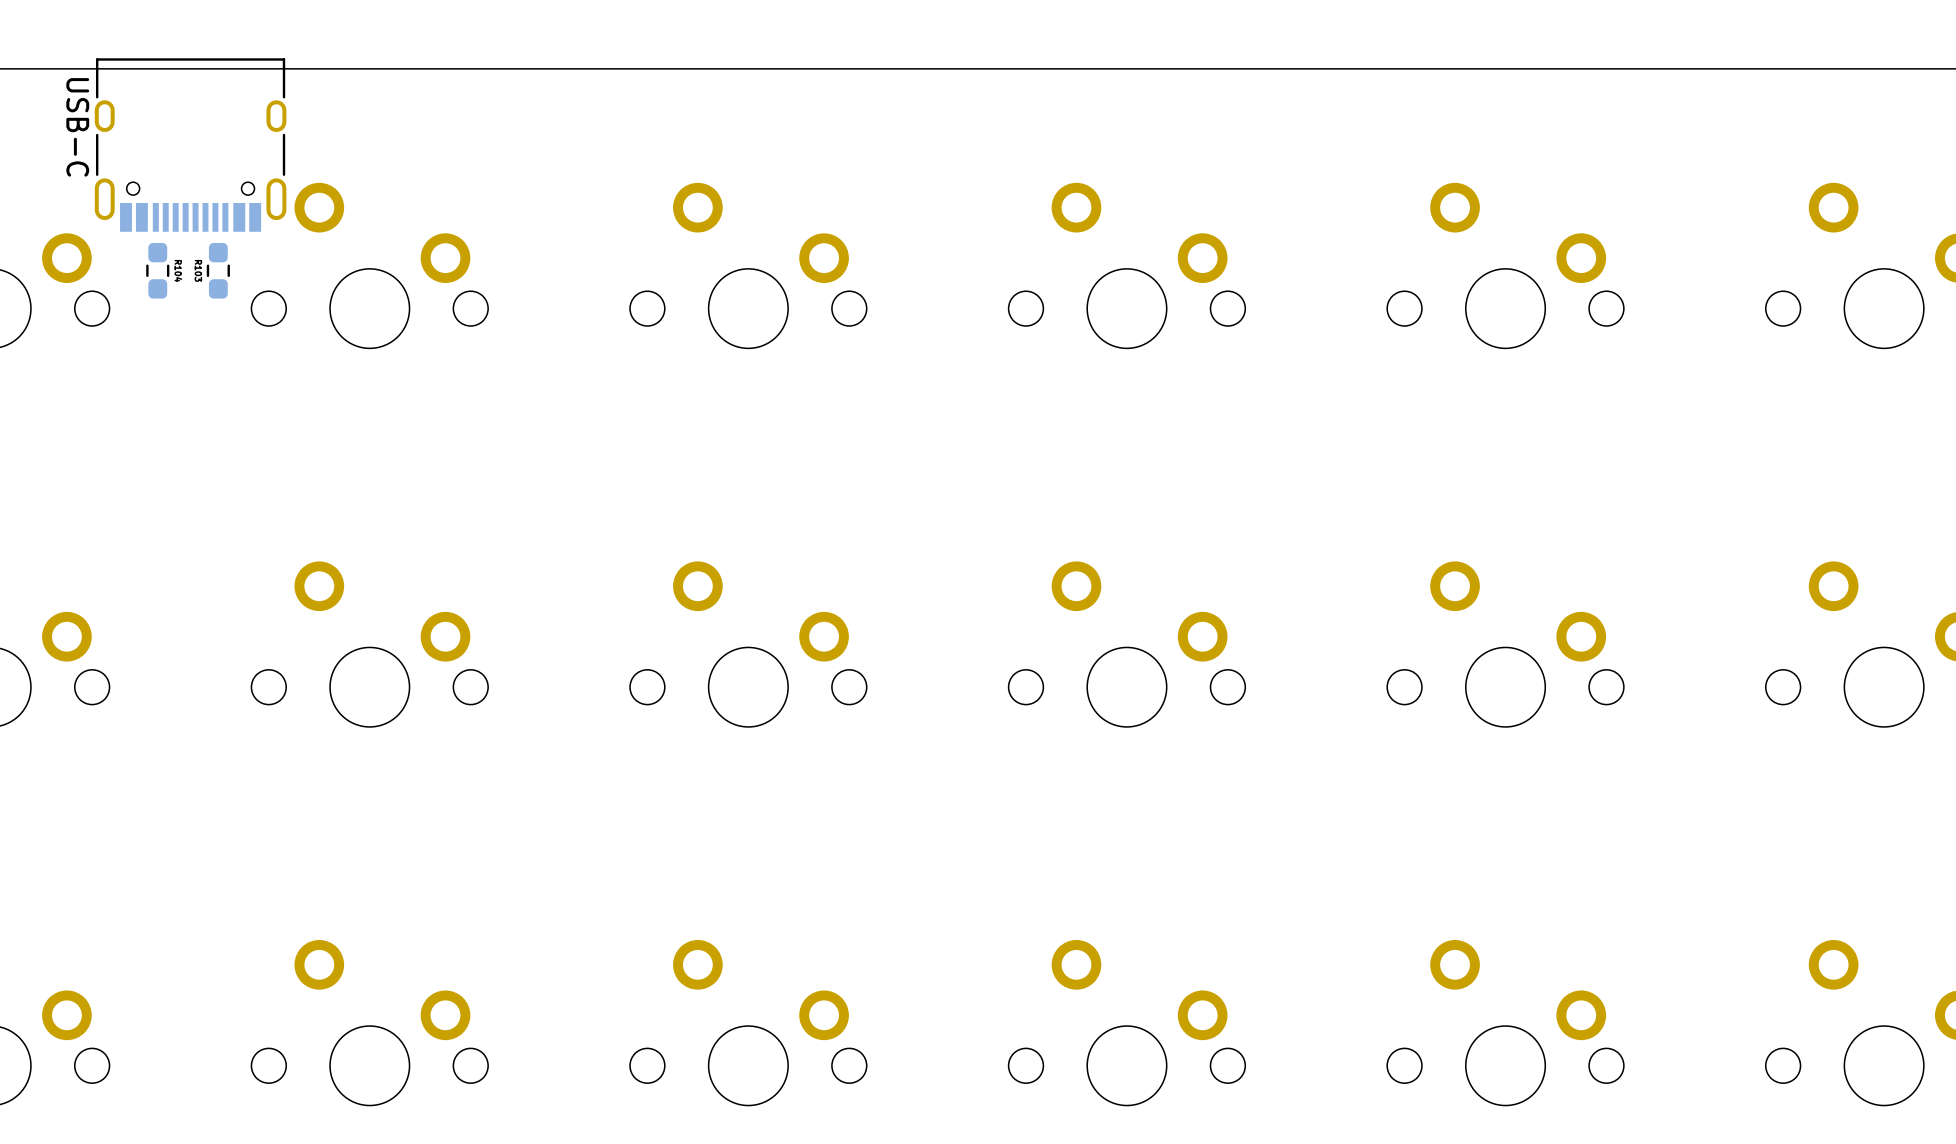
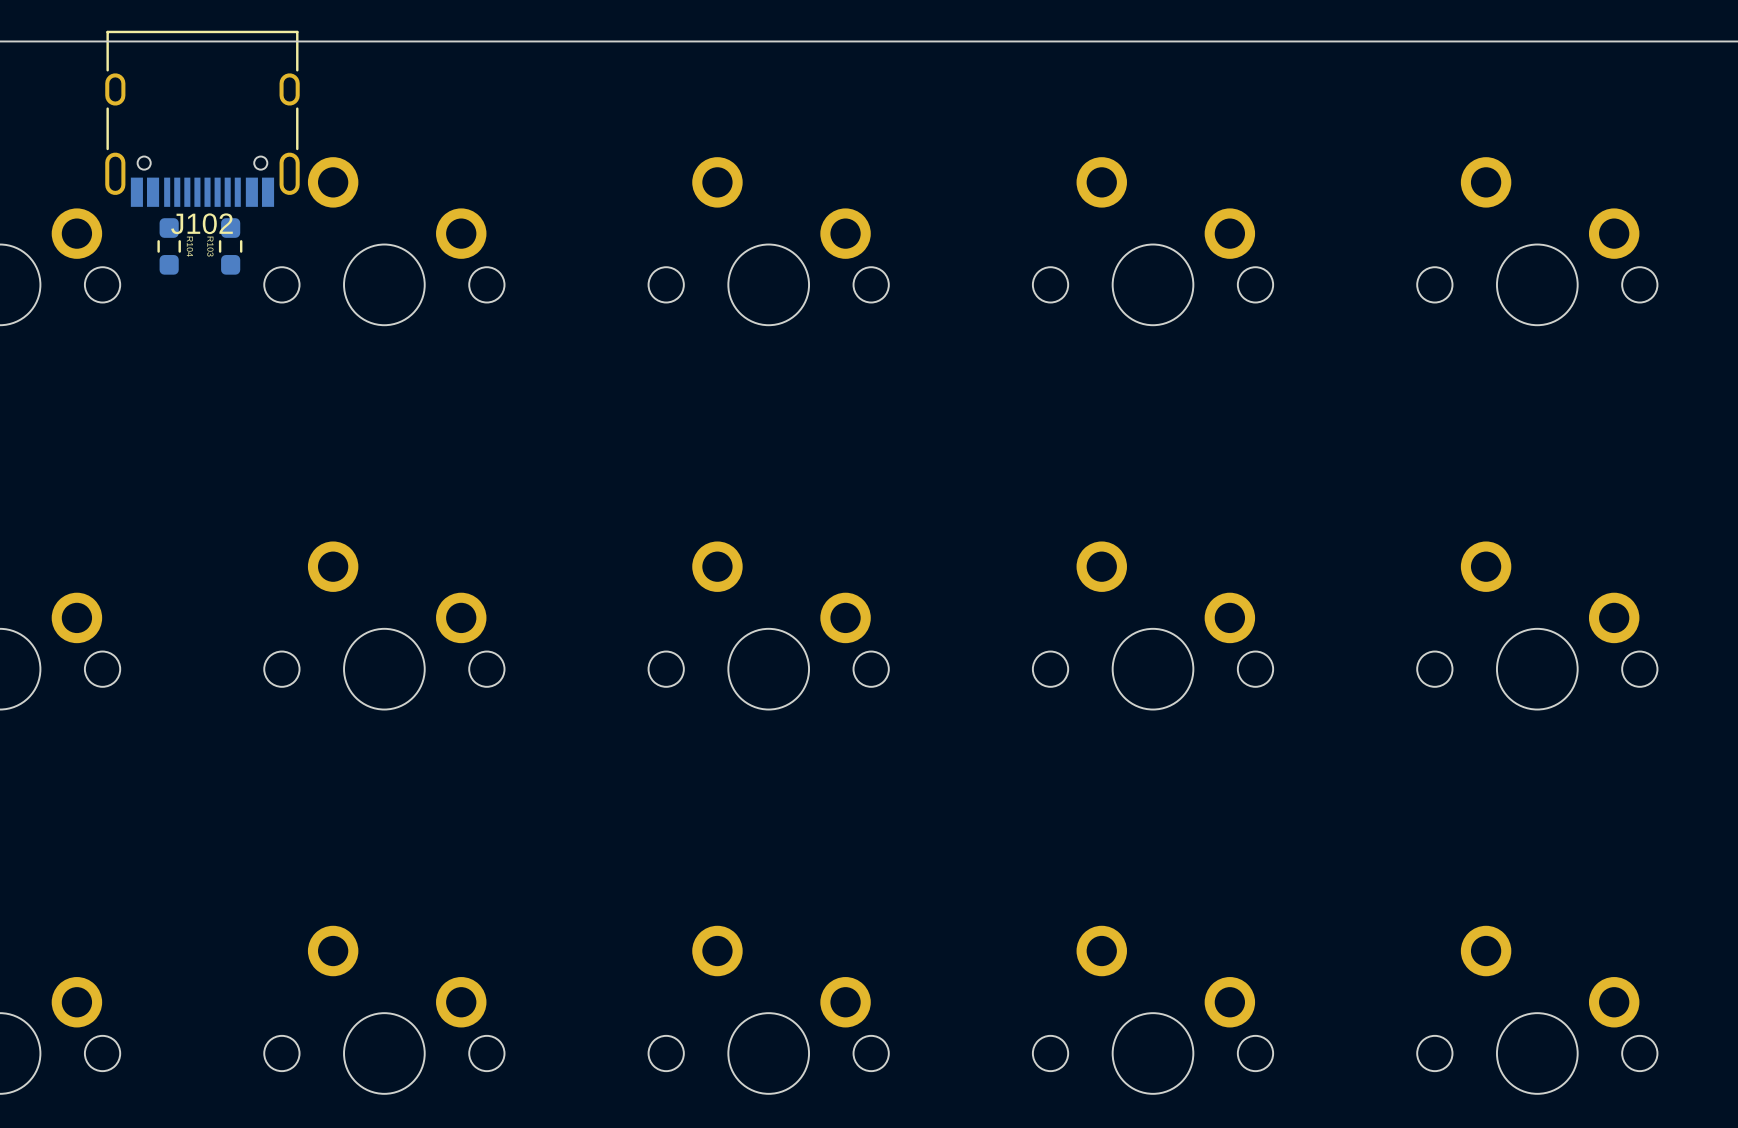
USB-C name: USB-C (77, 127) -> J102 (201, 223)

